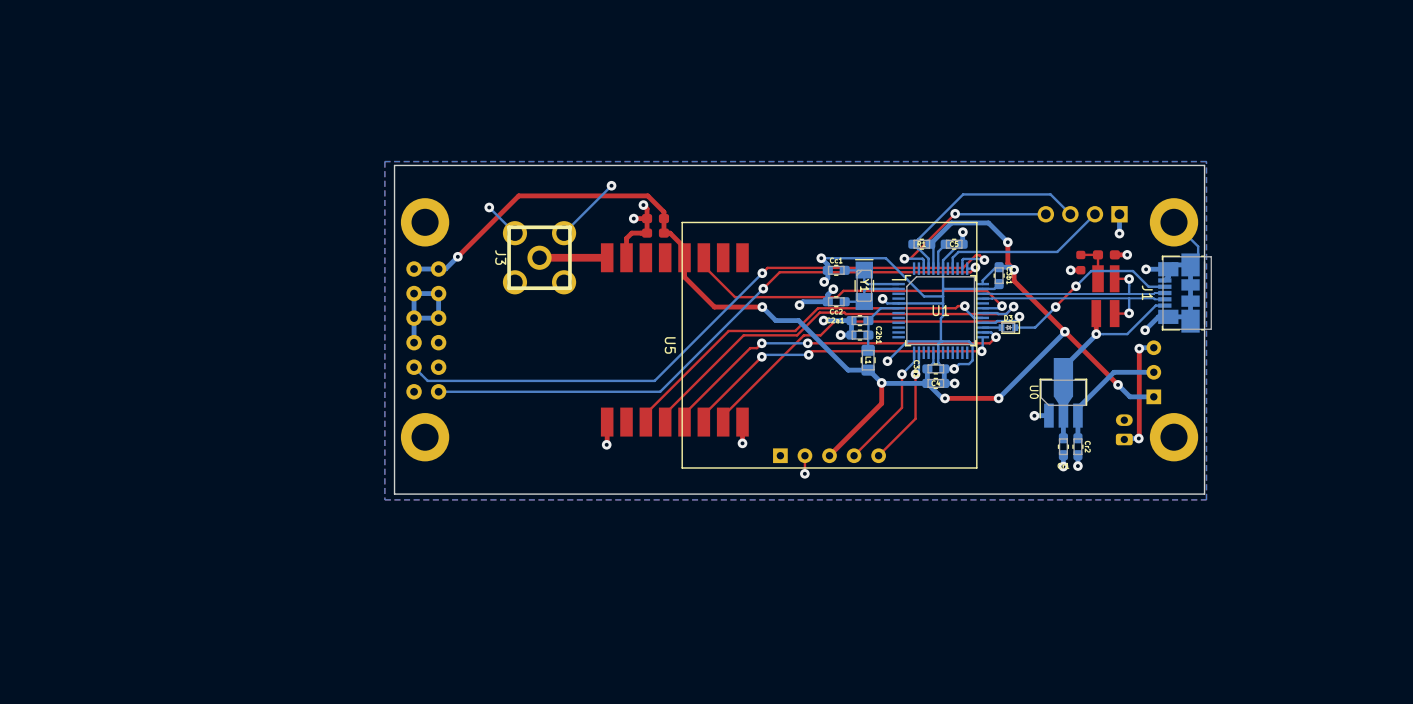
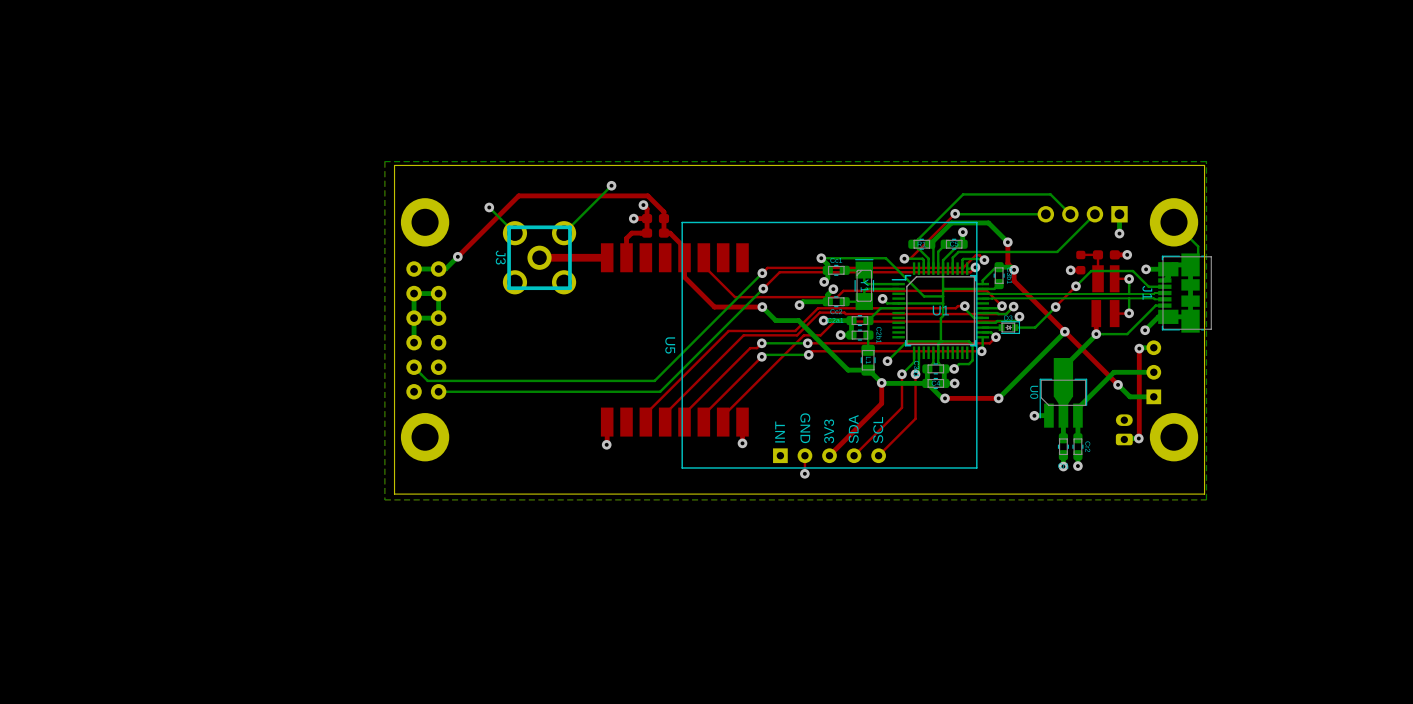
text: none -> GND (805, 428)
text: none -> SDA (853, 429)
text: none -> 3V3 (829, 431)
text: none -> SCL (878, 430)
text: none -> INT (780, 432)

